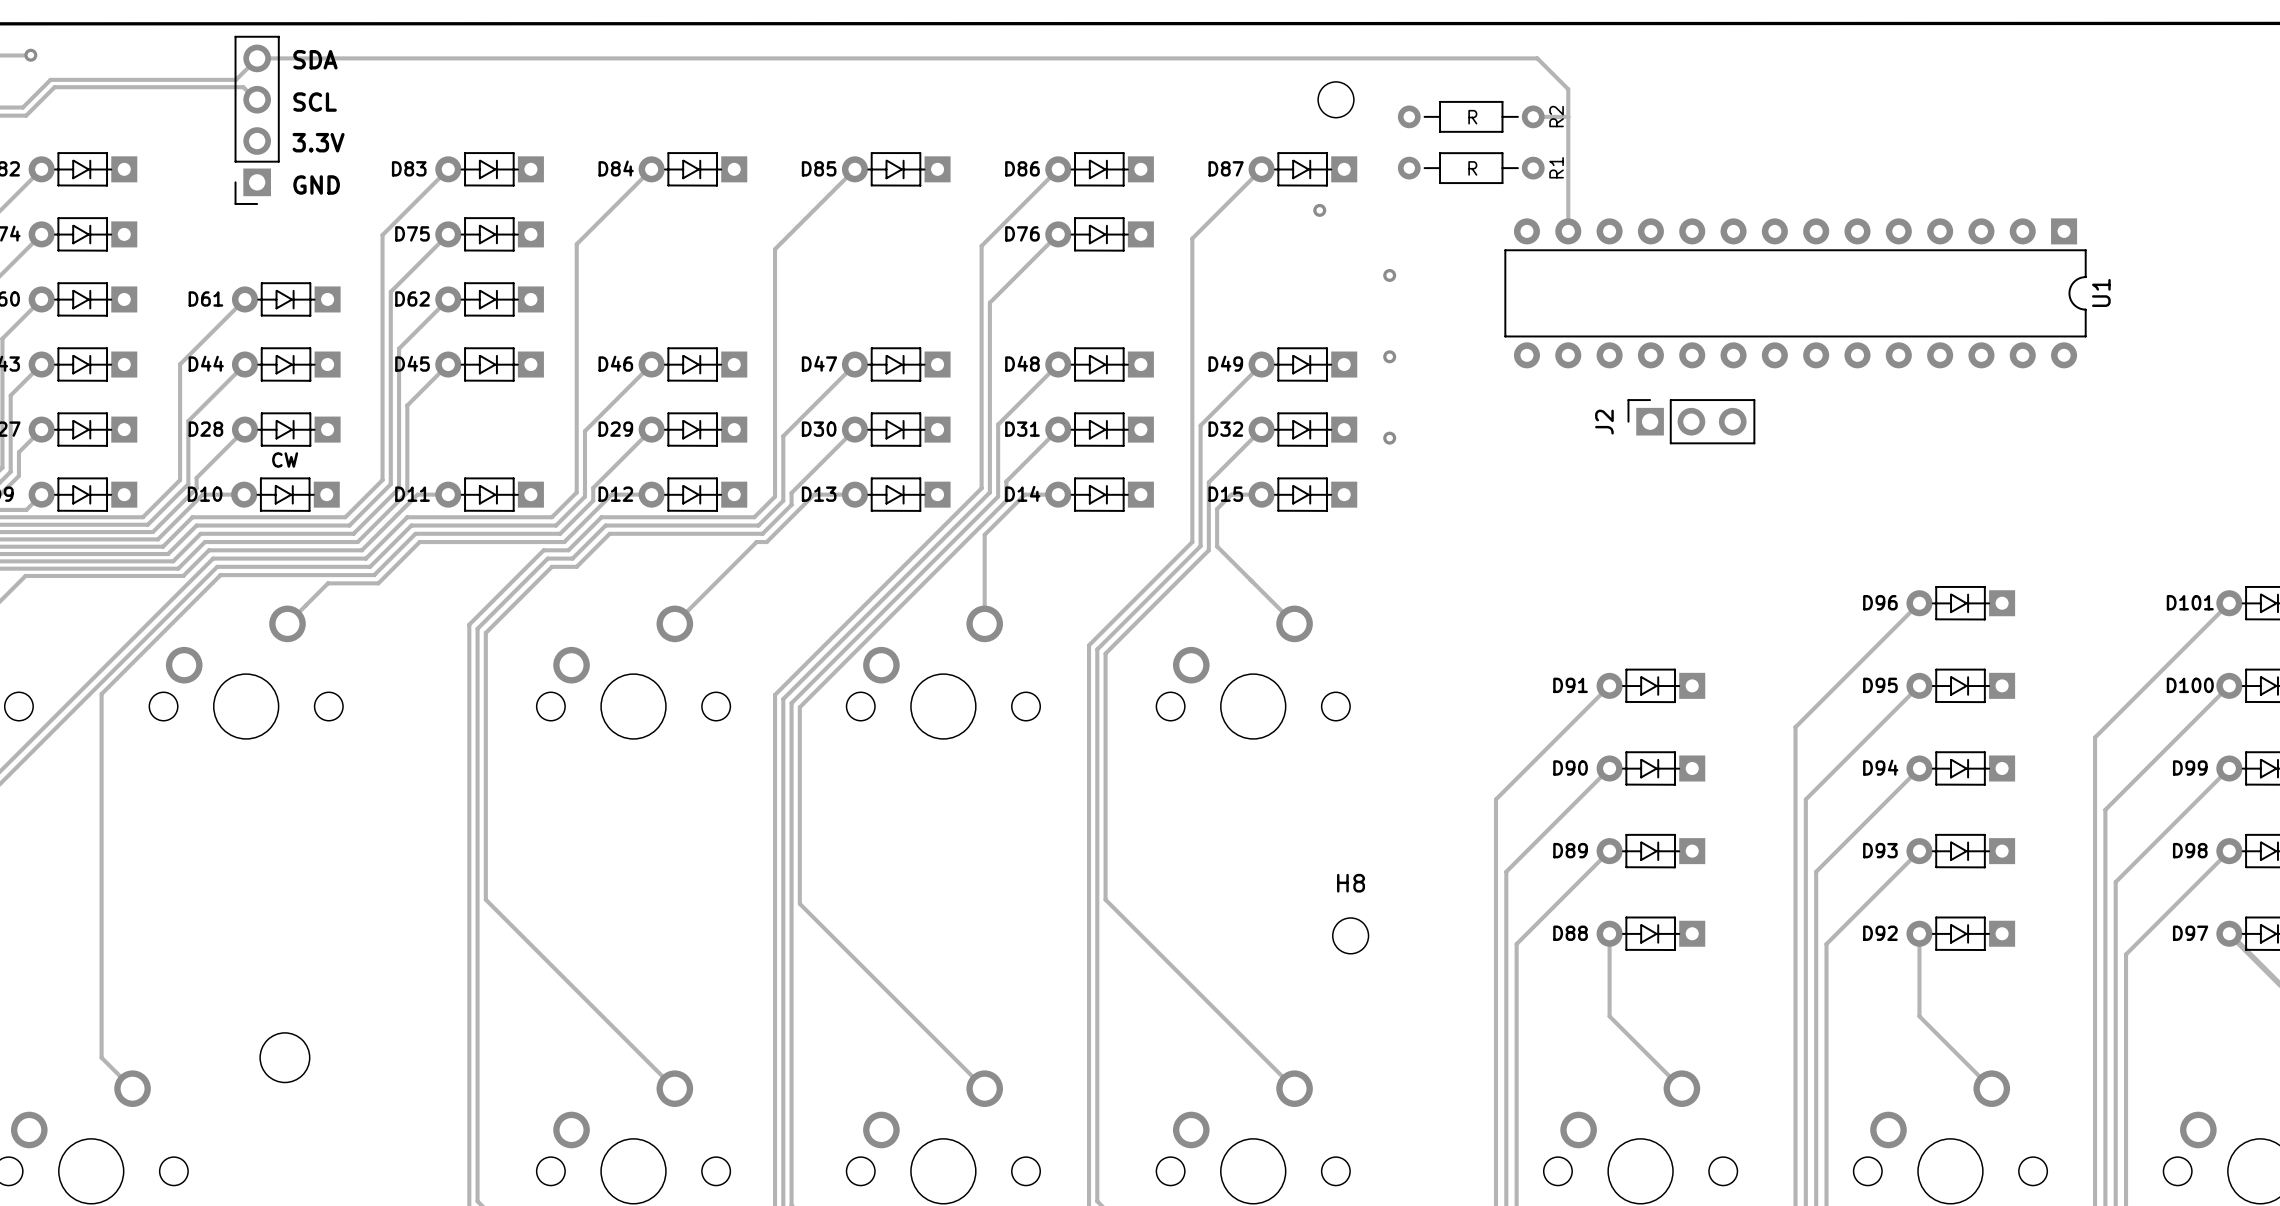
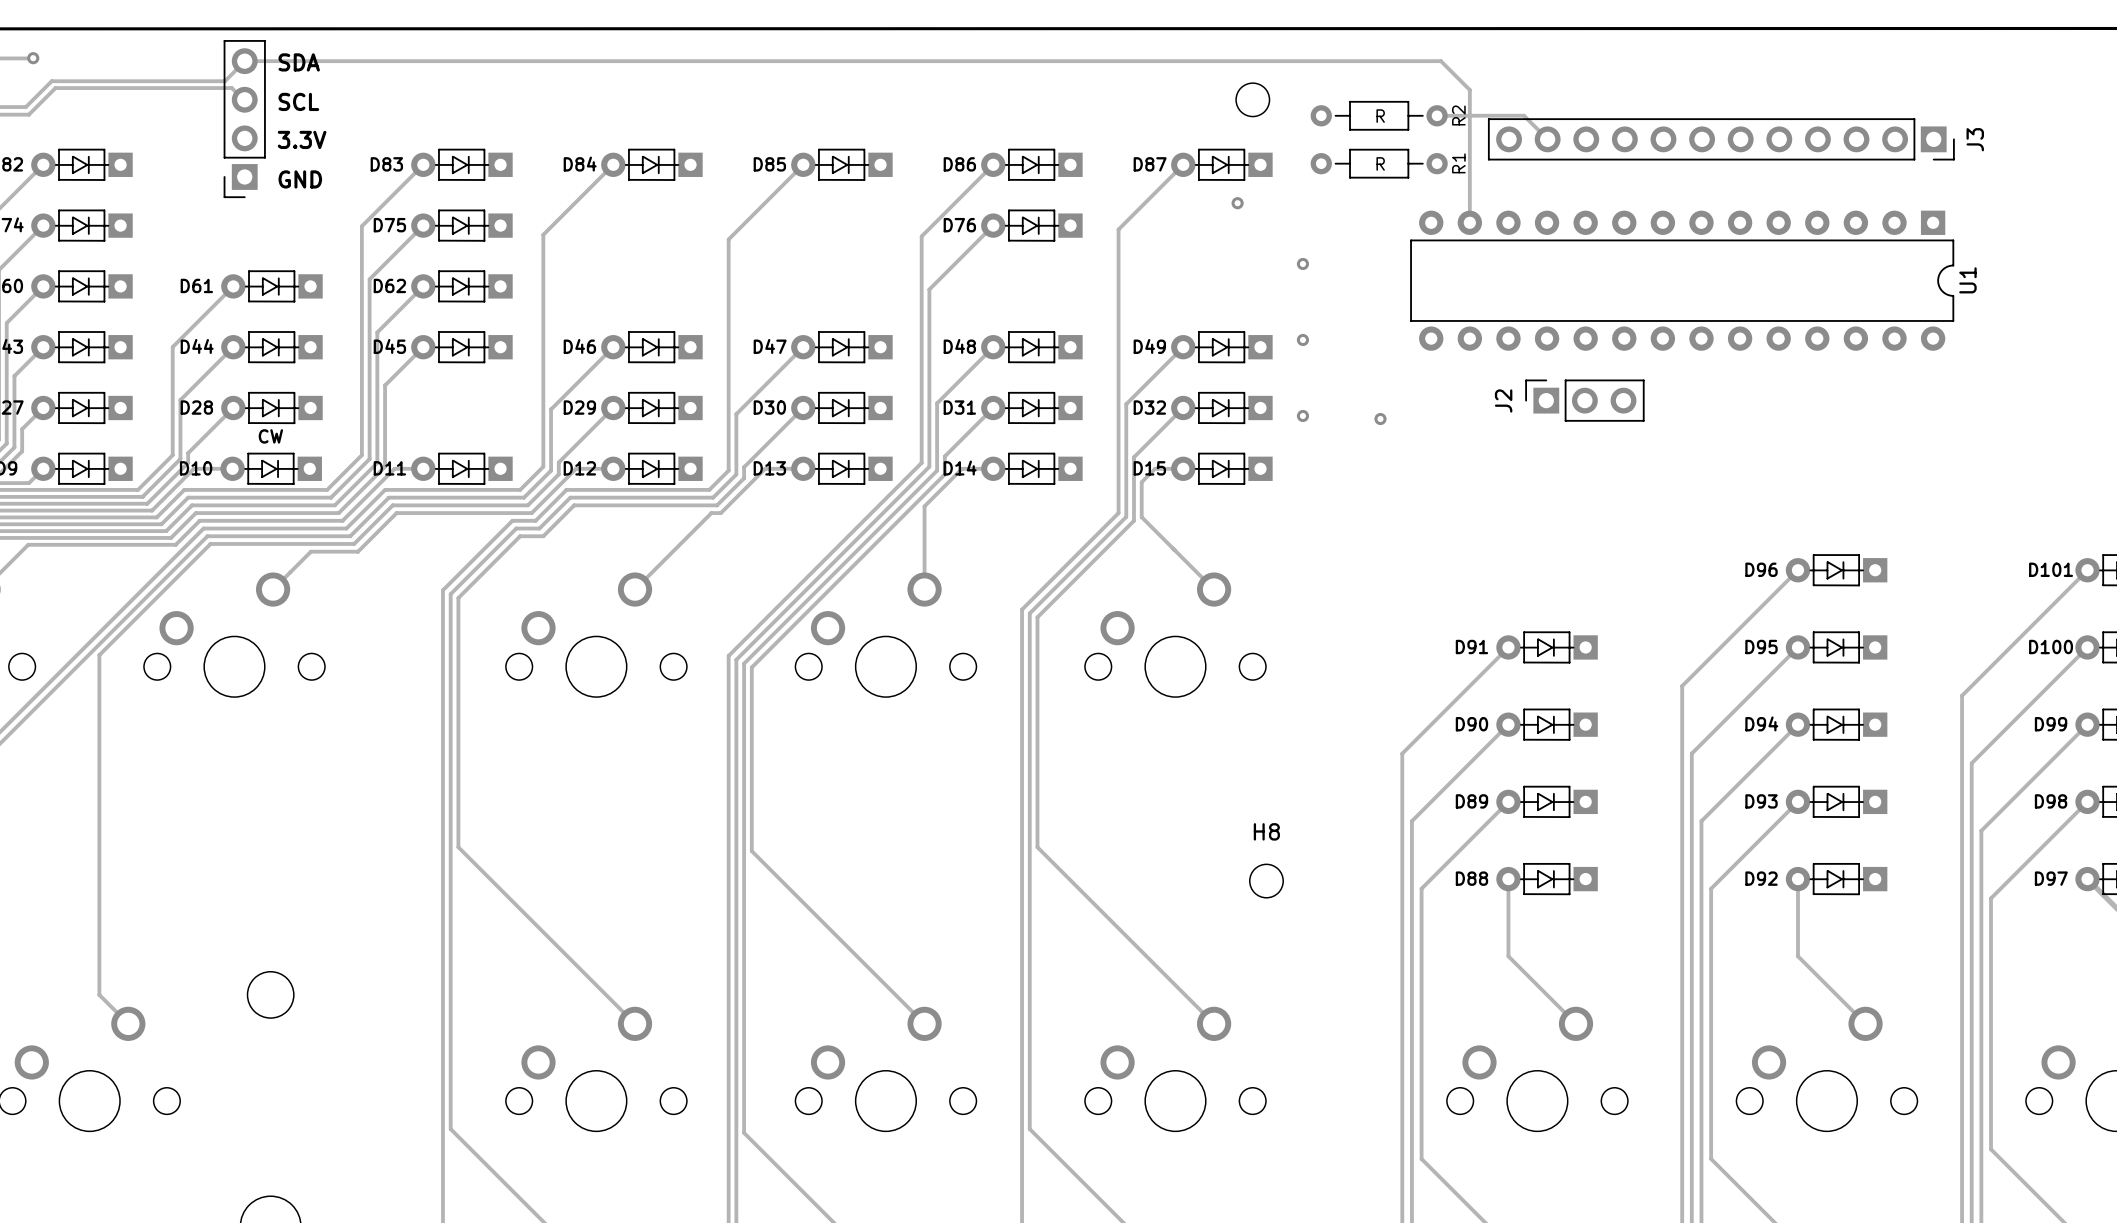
track: none -> (1469, 115) (1524, 115) (1547, 139)
J3: none -> (1721, 139)
via: none -> (1380, 419)

